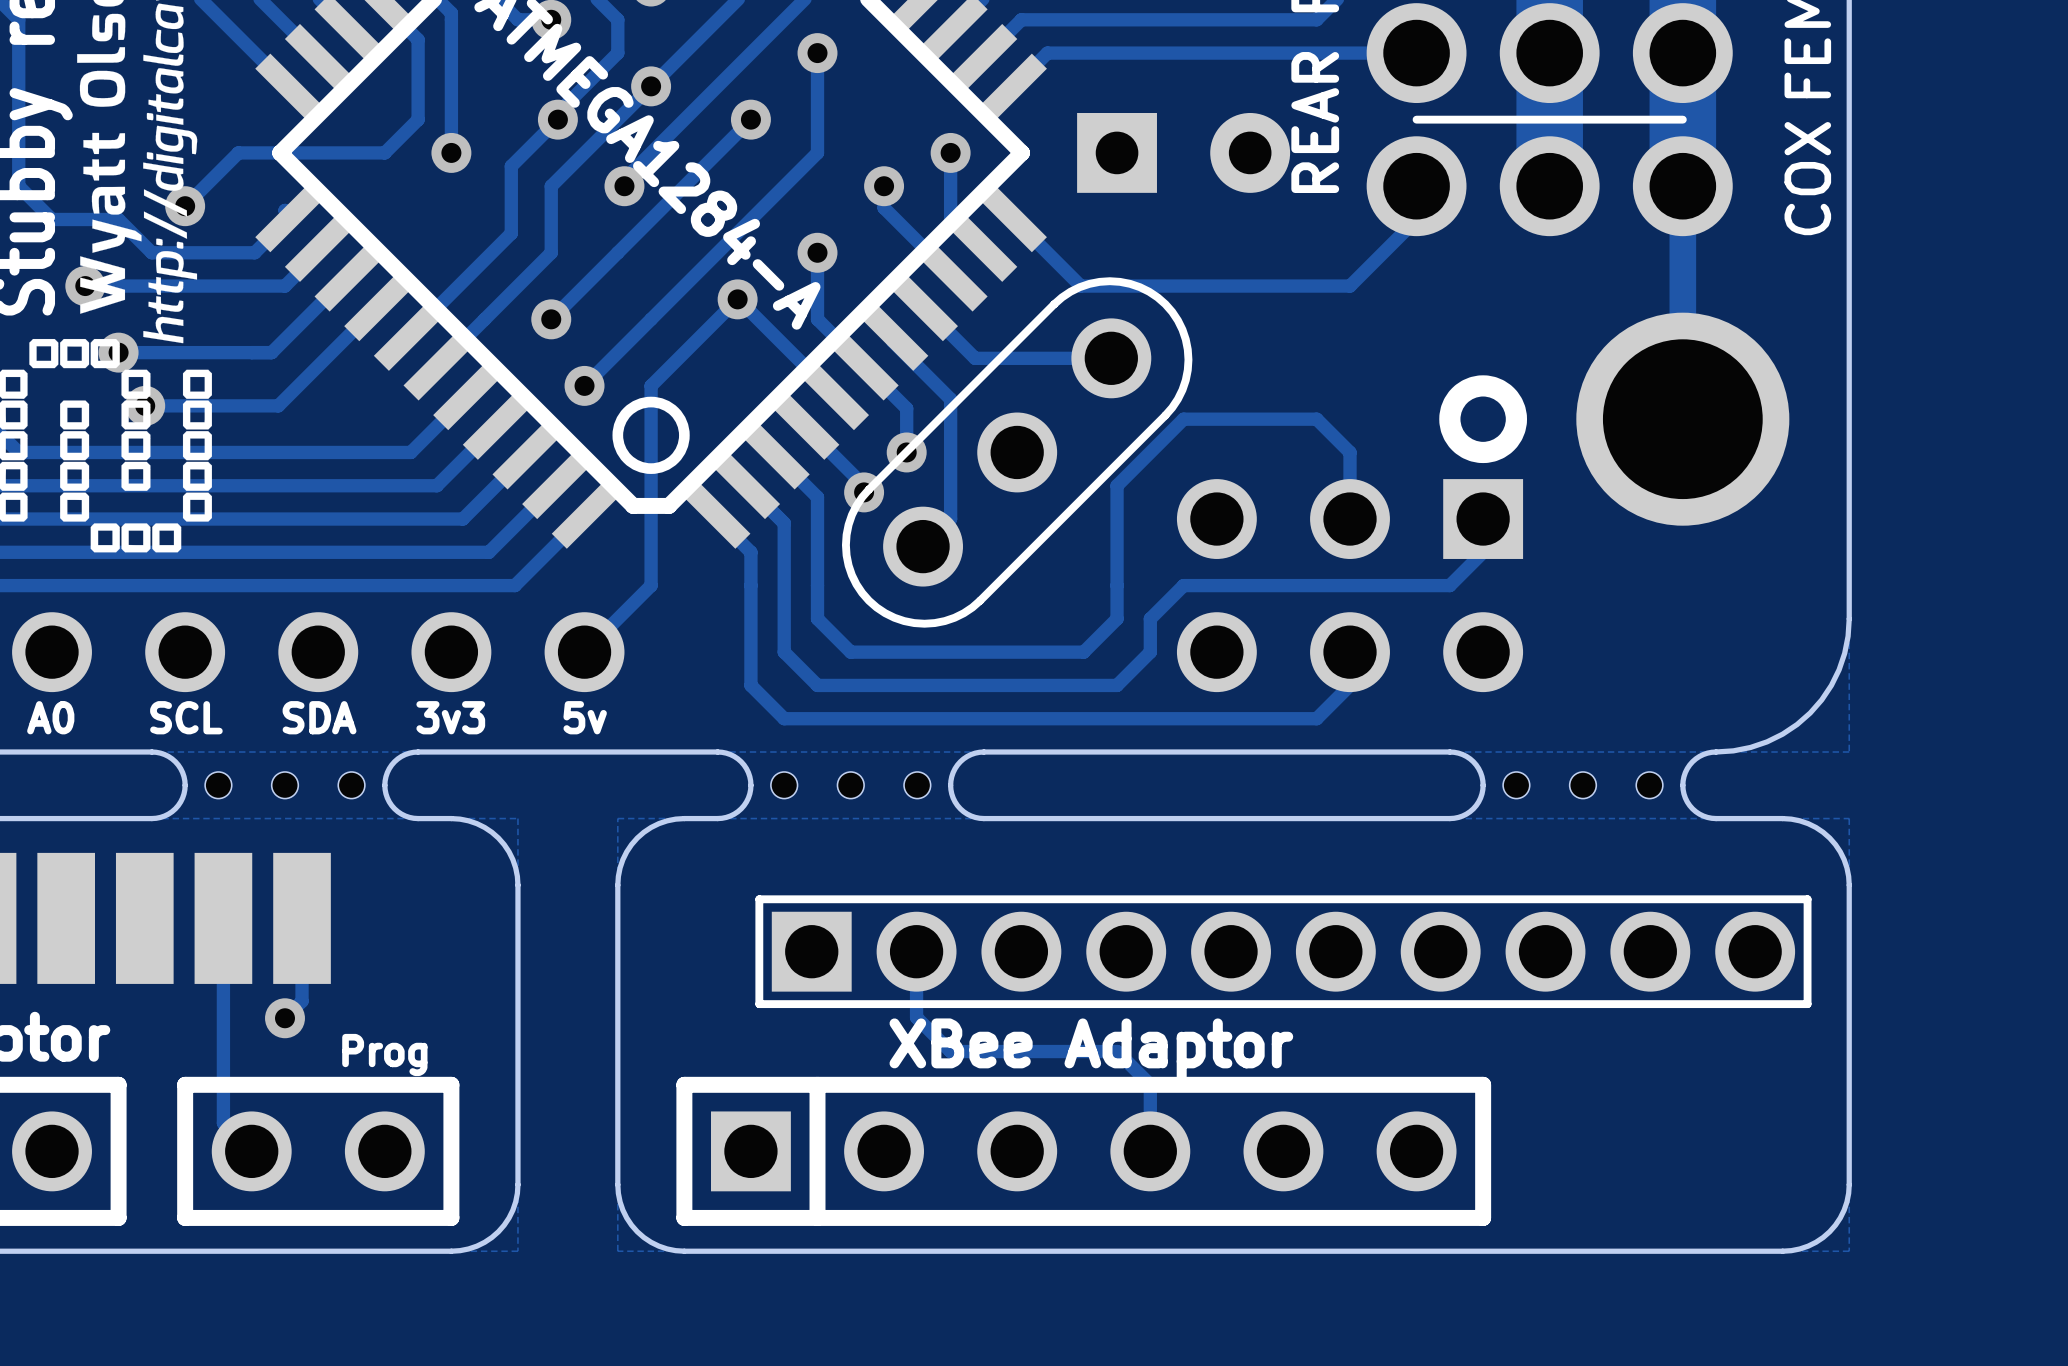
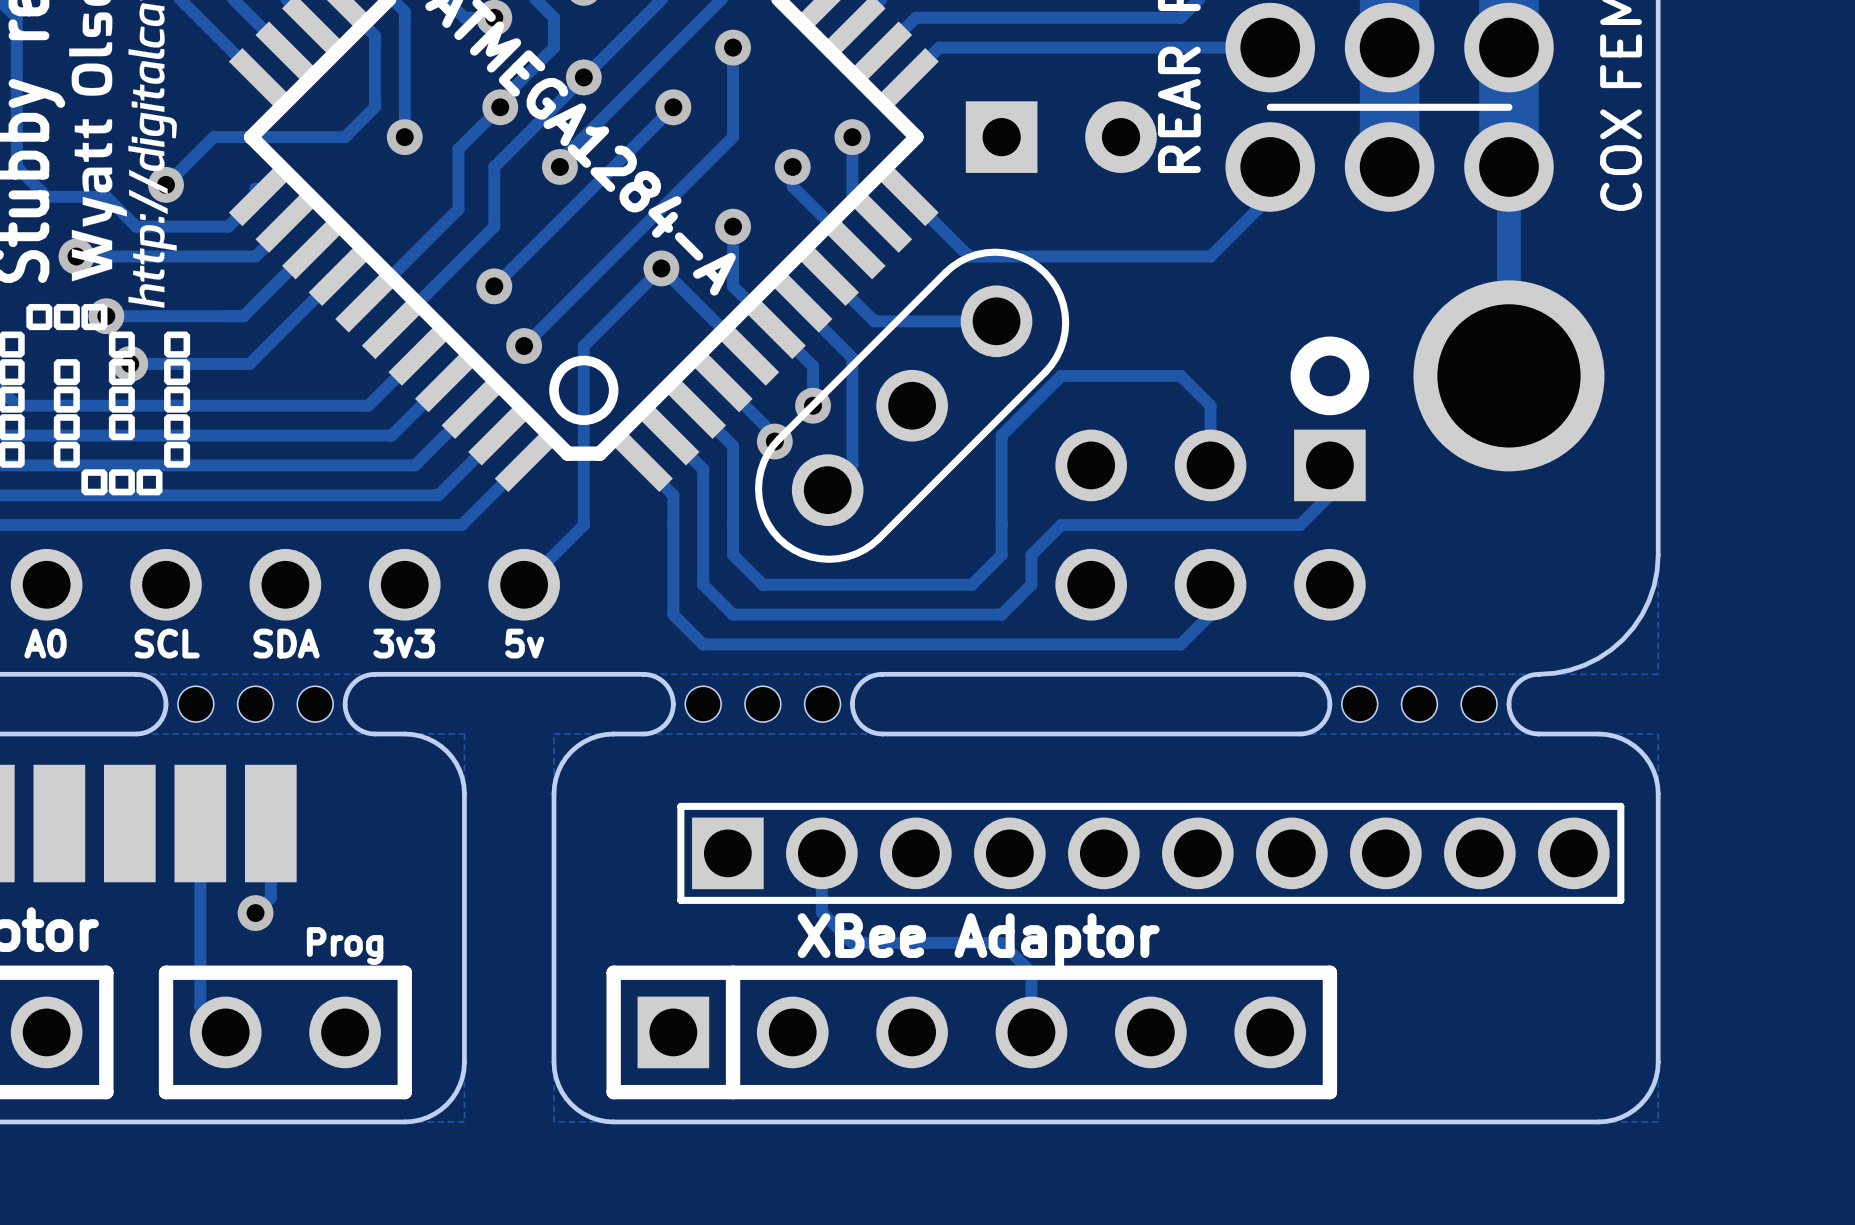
part footprint: [205, 771, 365, 799] -> [177, 686, 334, 723]
part footprint: [770, 771, 931, 799] -> [685, 686, 841, 723]
part footprint: [1503, 771, 1663, 799] -> [1341, 686, 1498, 723]

